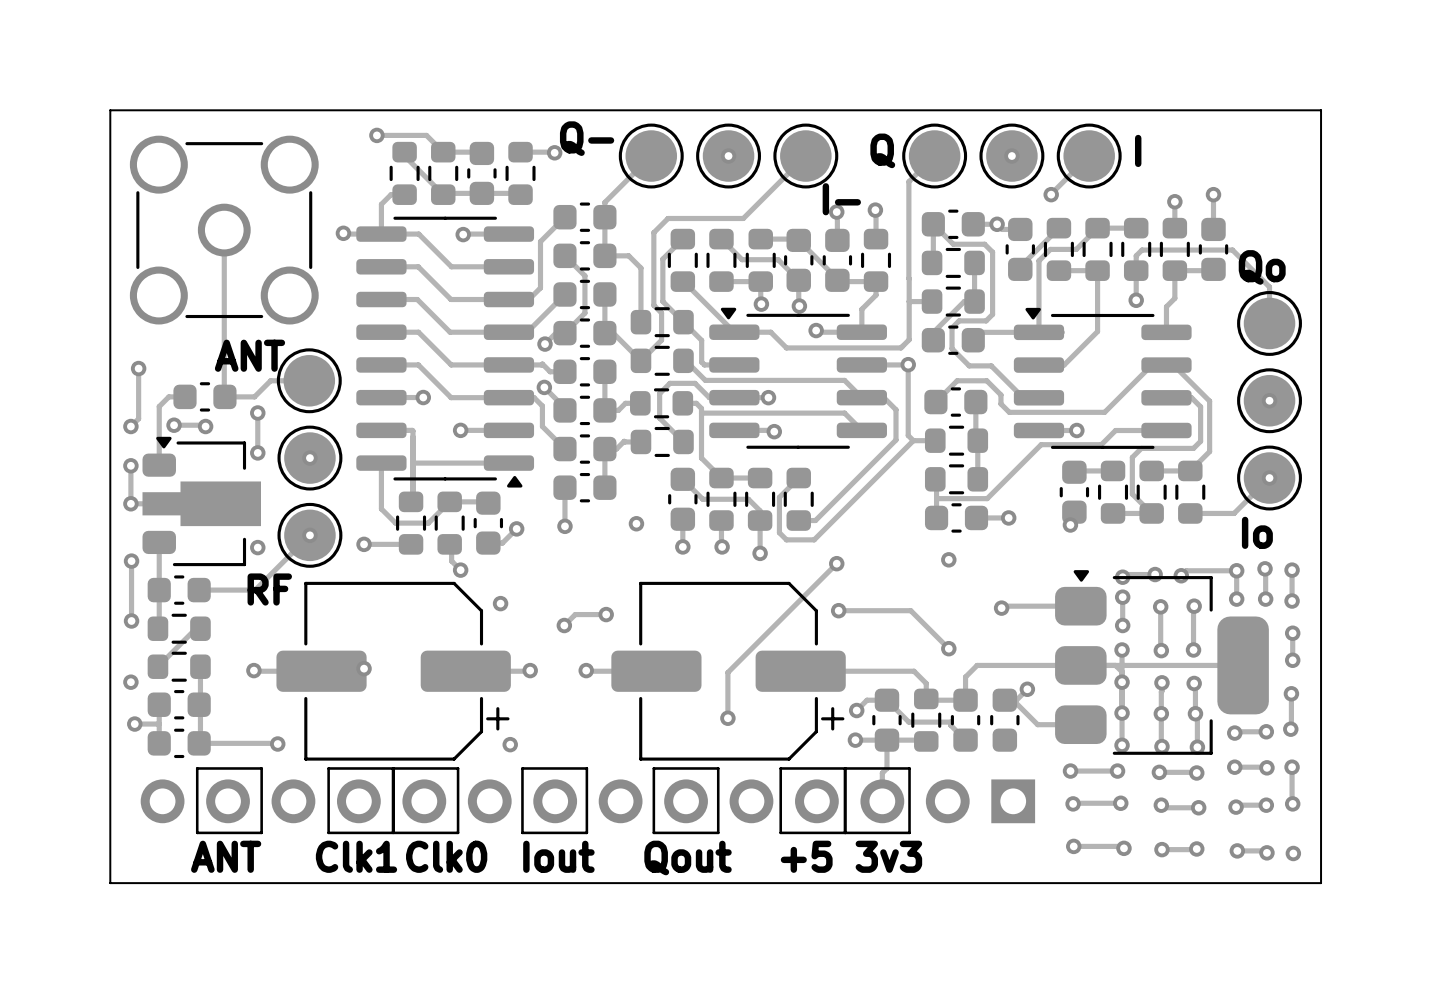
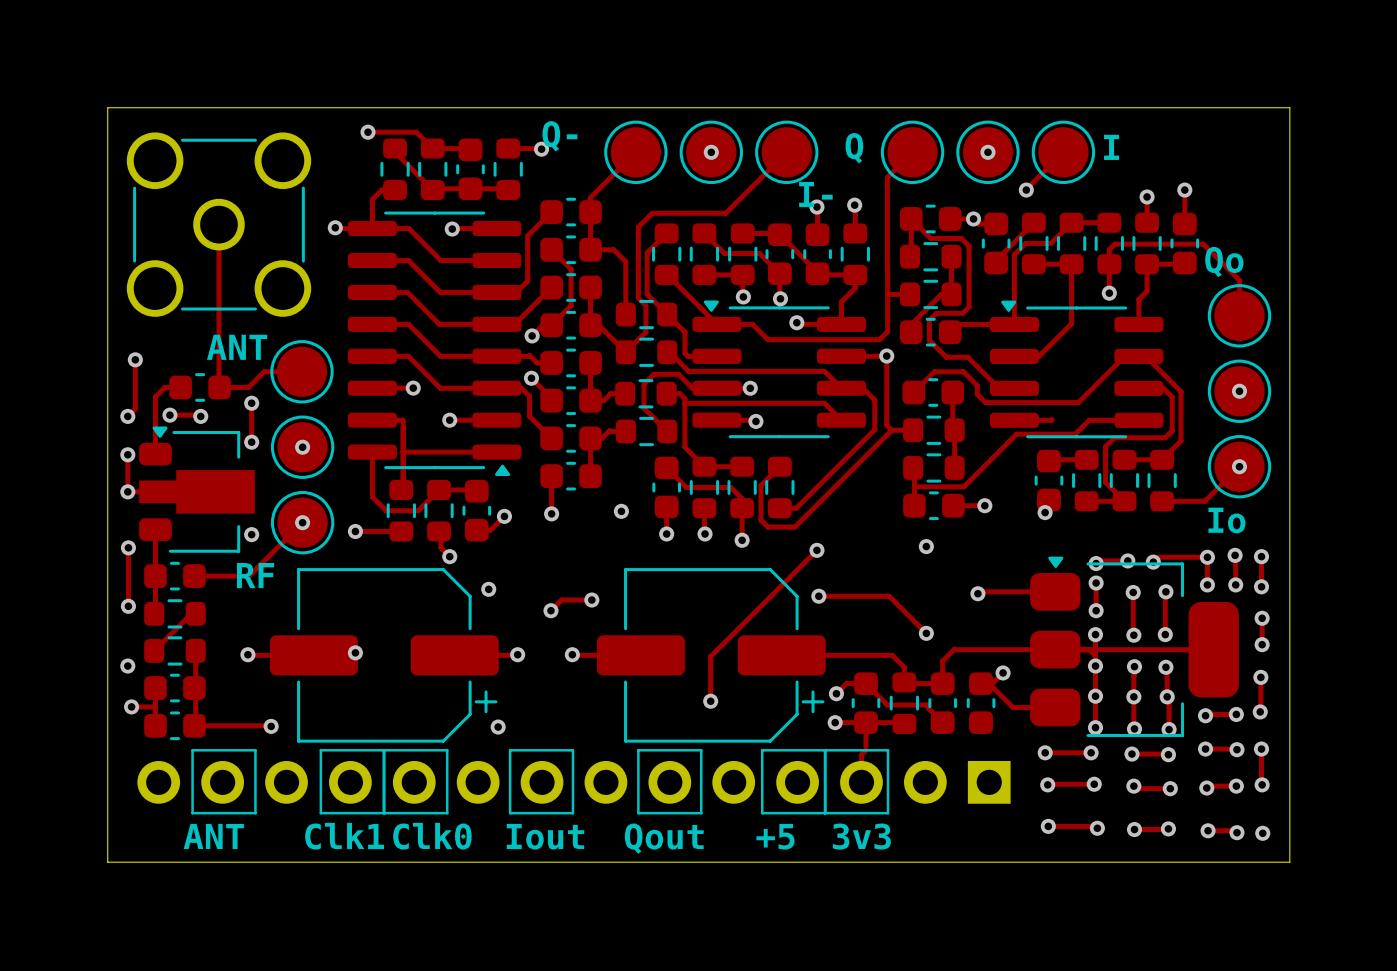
via: (1076, 430) -> none

